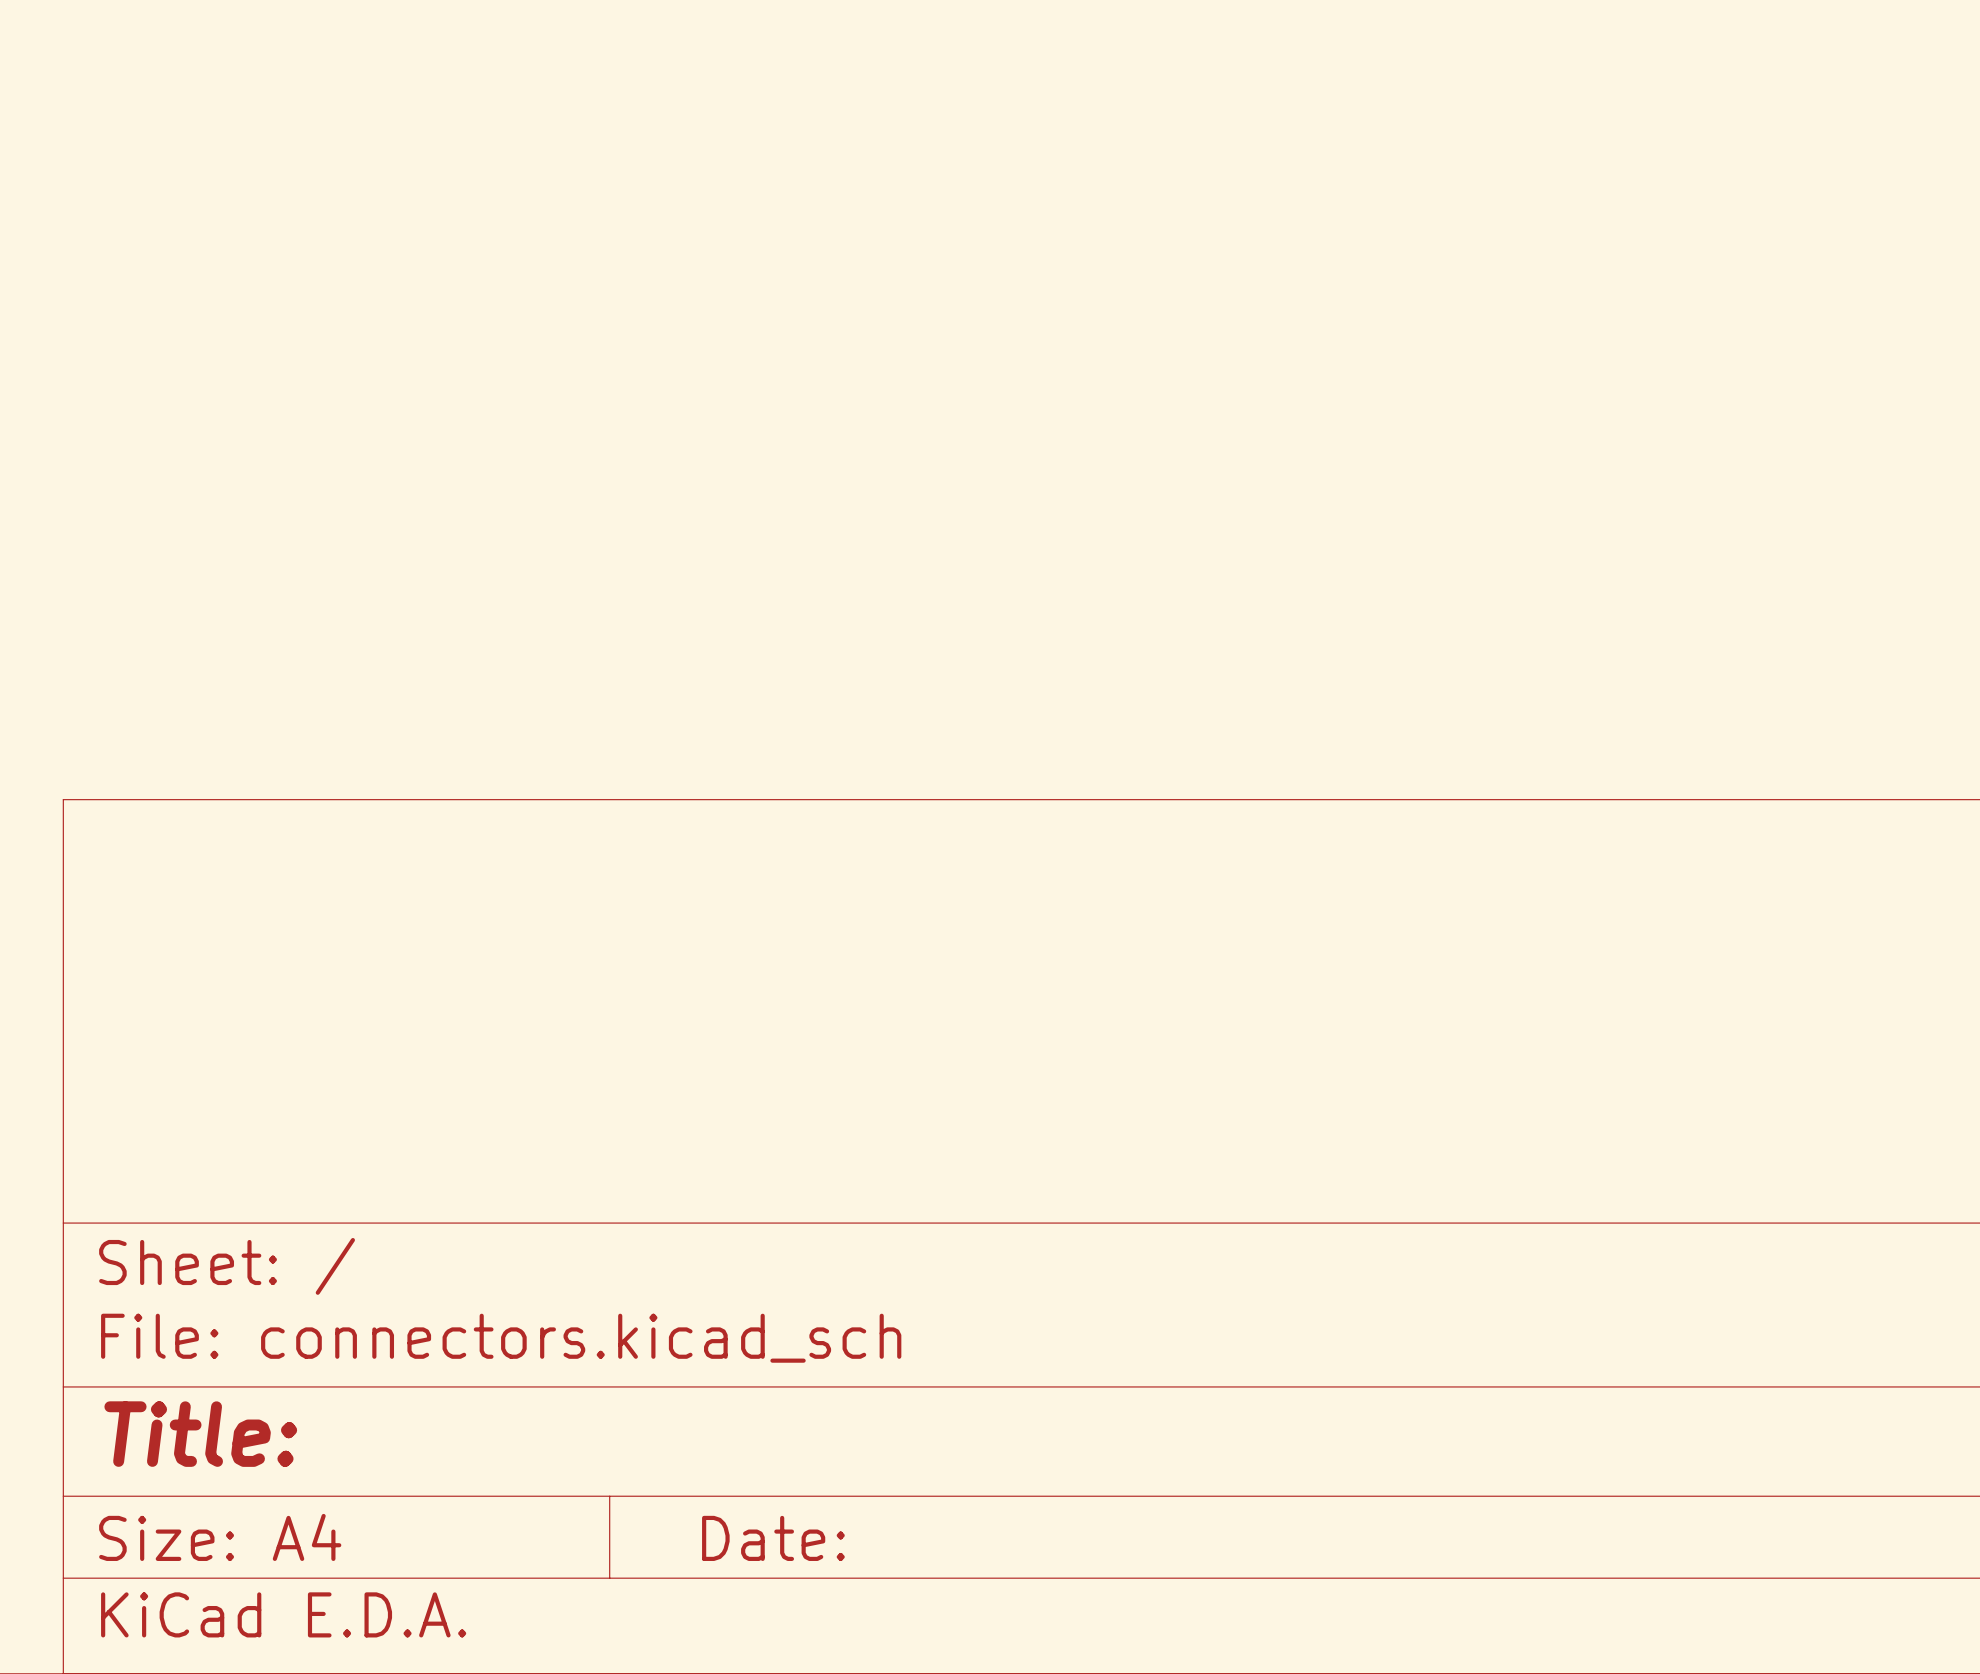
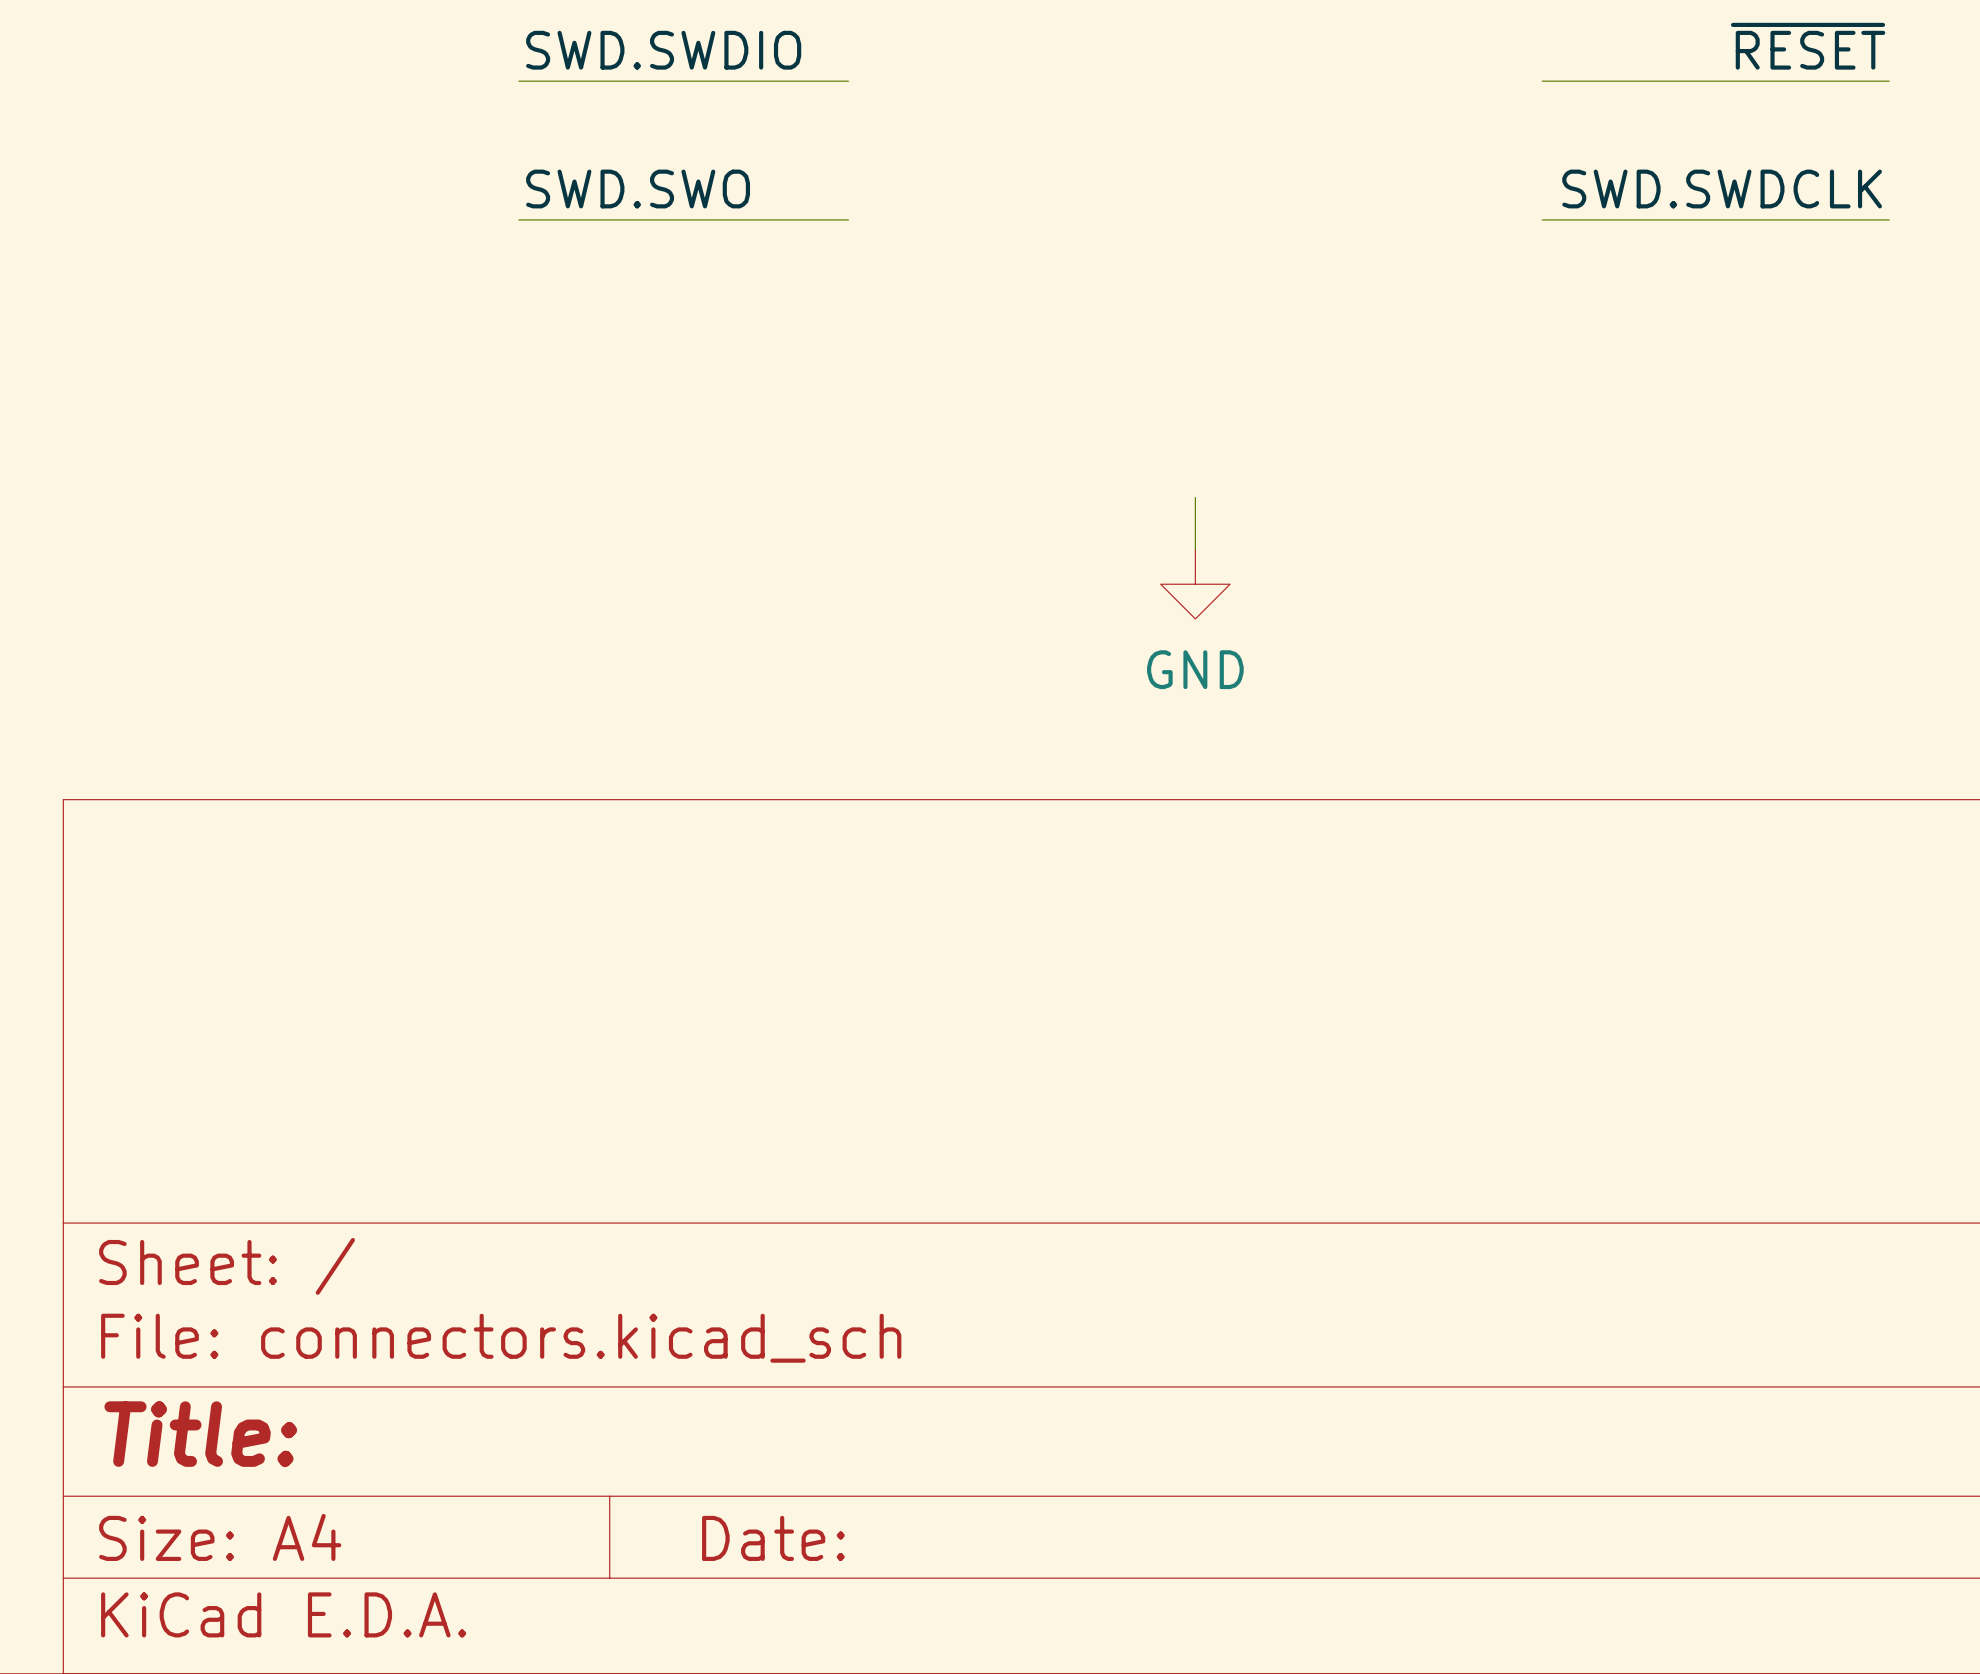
label: none -> ~{RESET} (1808, 46)
label: none -> SWD.SWDIO (663, 50)
wire: none -> (518, 81) (848, 81)
wire: none -> (1542, 81) (1889, 81)
label: none -> SWD.SWO (638, 189)
label: none -> SWD.SWDCLK (1722, 189)
wire: none -> (518, 219) (848, 219)
wire: none -> (1542, 219) (1889, 219)
wire: none -> (1195, 497) (1195, 549)
power symbol: none -> GND (1195, 584)

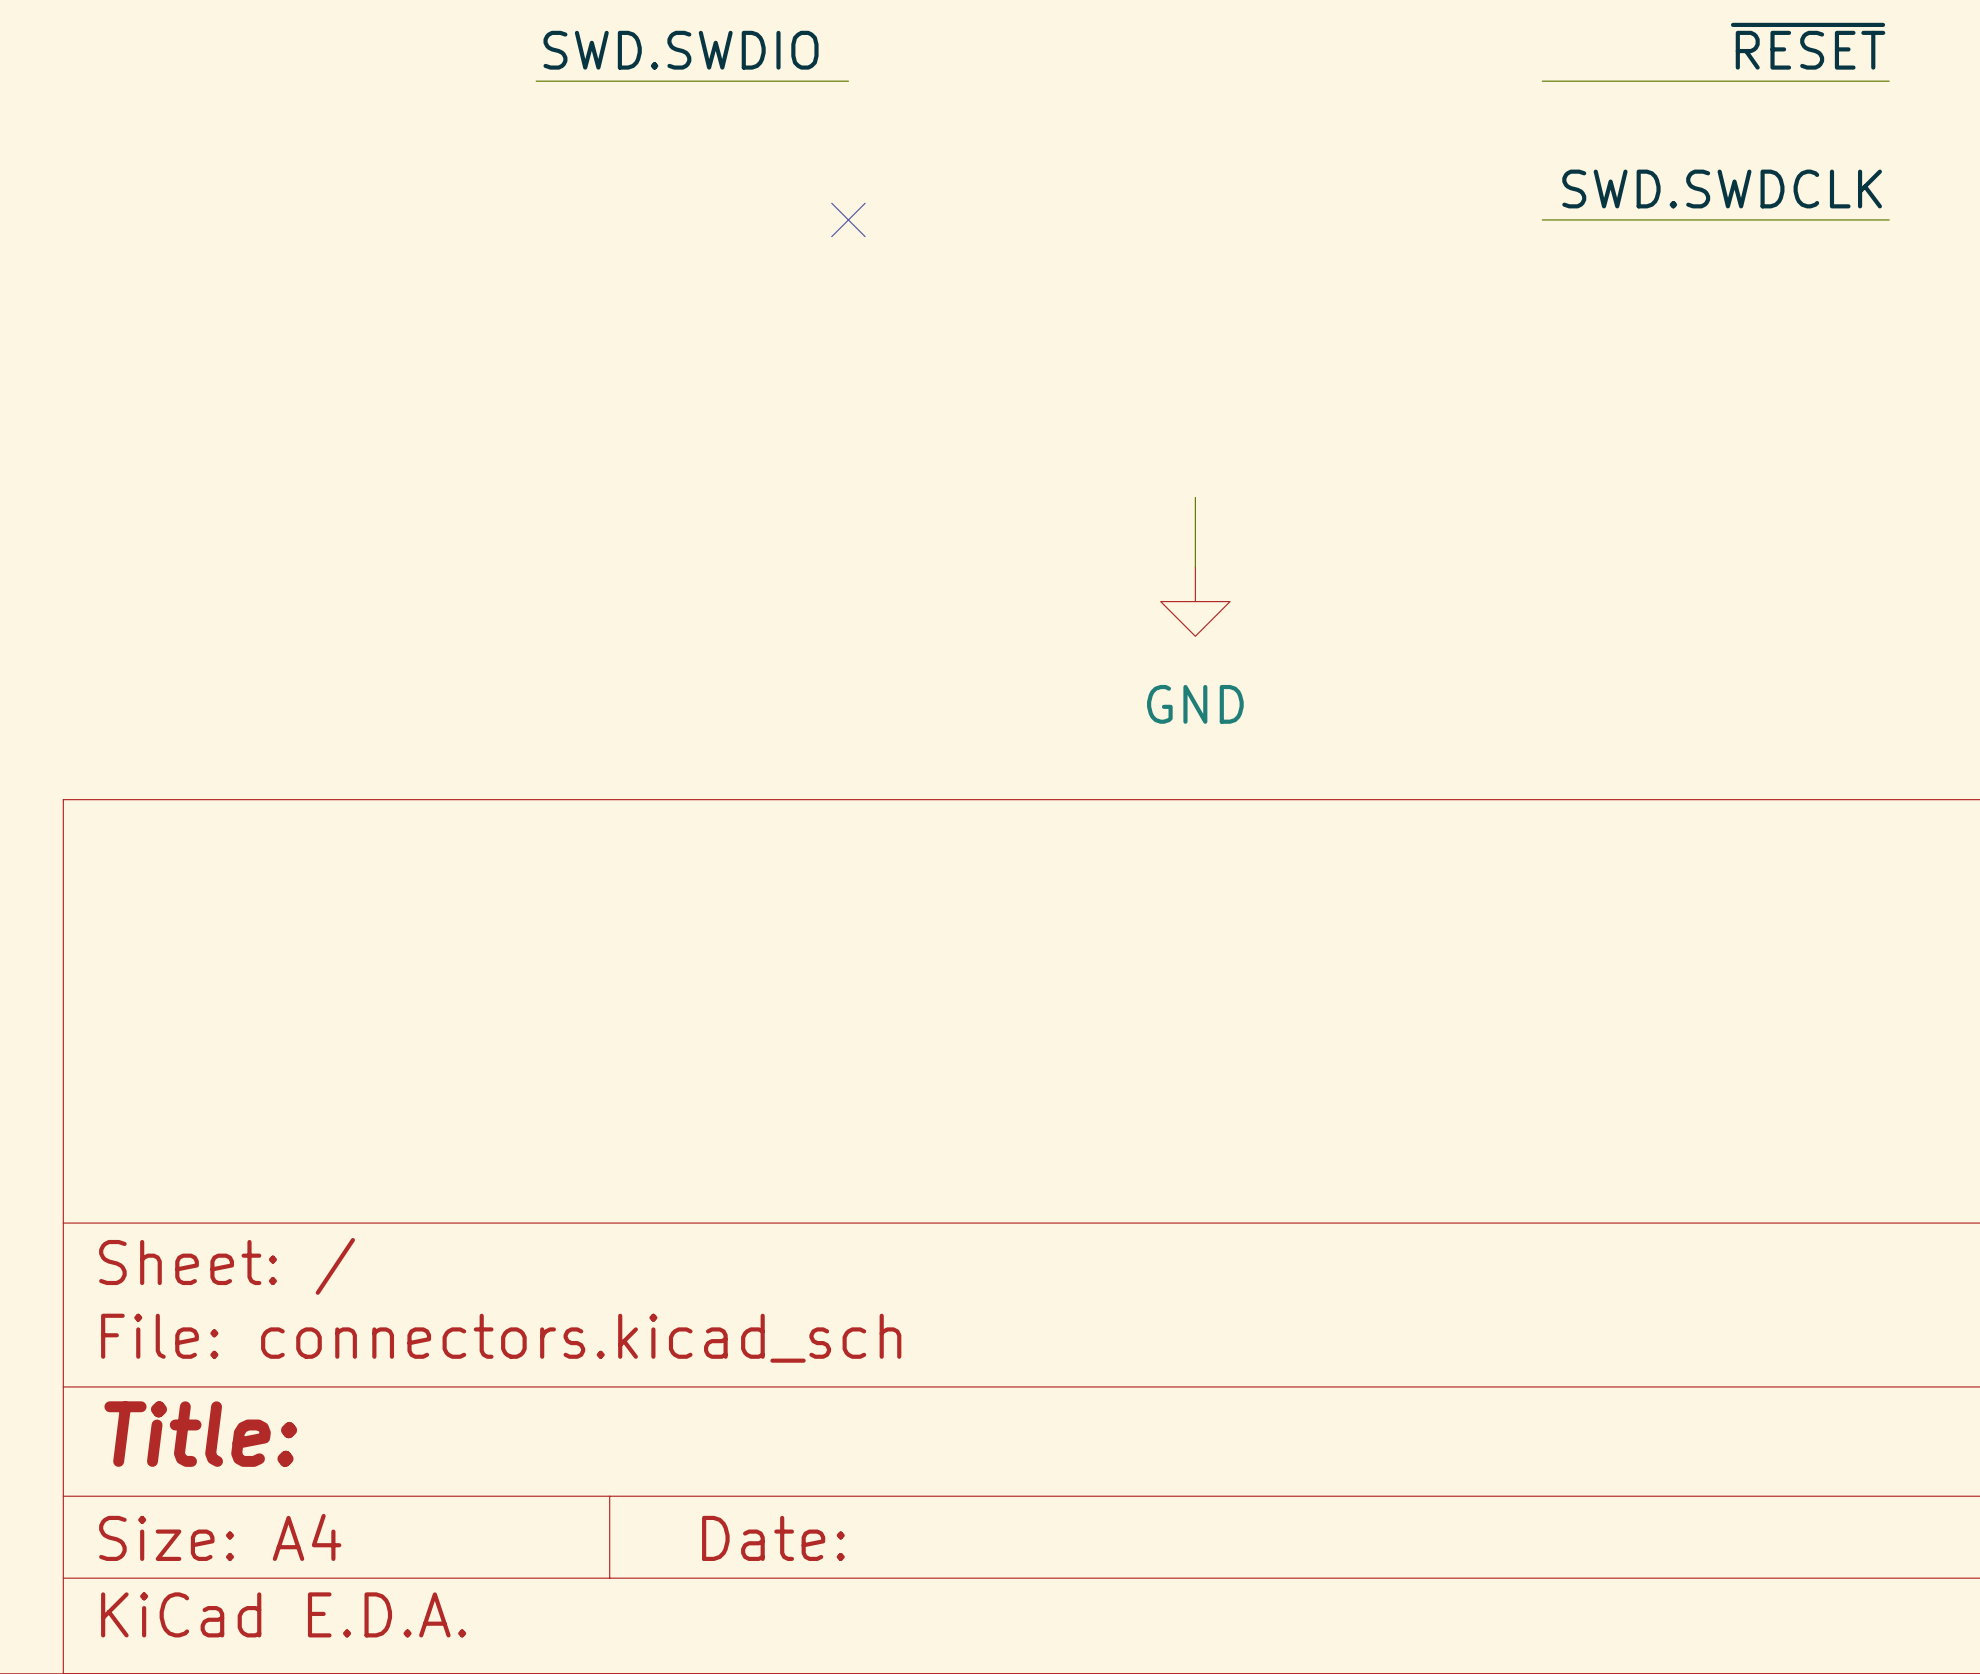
label position: SWD.SWDIO (663, 50) -> SWD.SWDIO (681, 50)
wire: (518, 81) (536, 81) -> none
label: SWD.SWO (638, 189) -> none
wire: (518, 219) (848, 219) -> none
no-connect mark: none -> (848, 219)
power symbol position: GND (1195, 584) -> GND (1195, 601)
power symbol text position: GND (1195, 669) -> GND (1195, 704)

